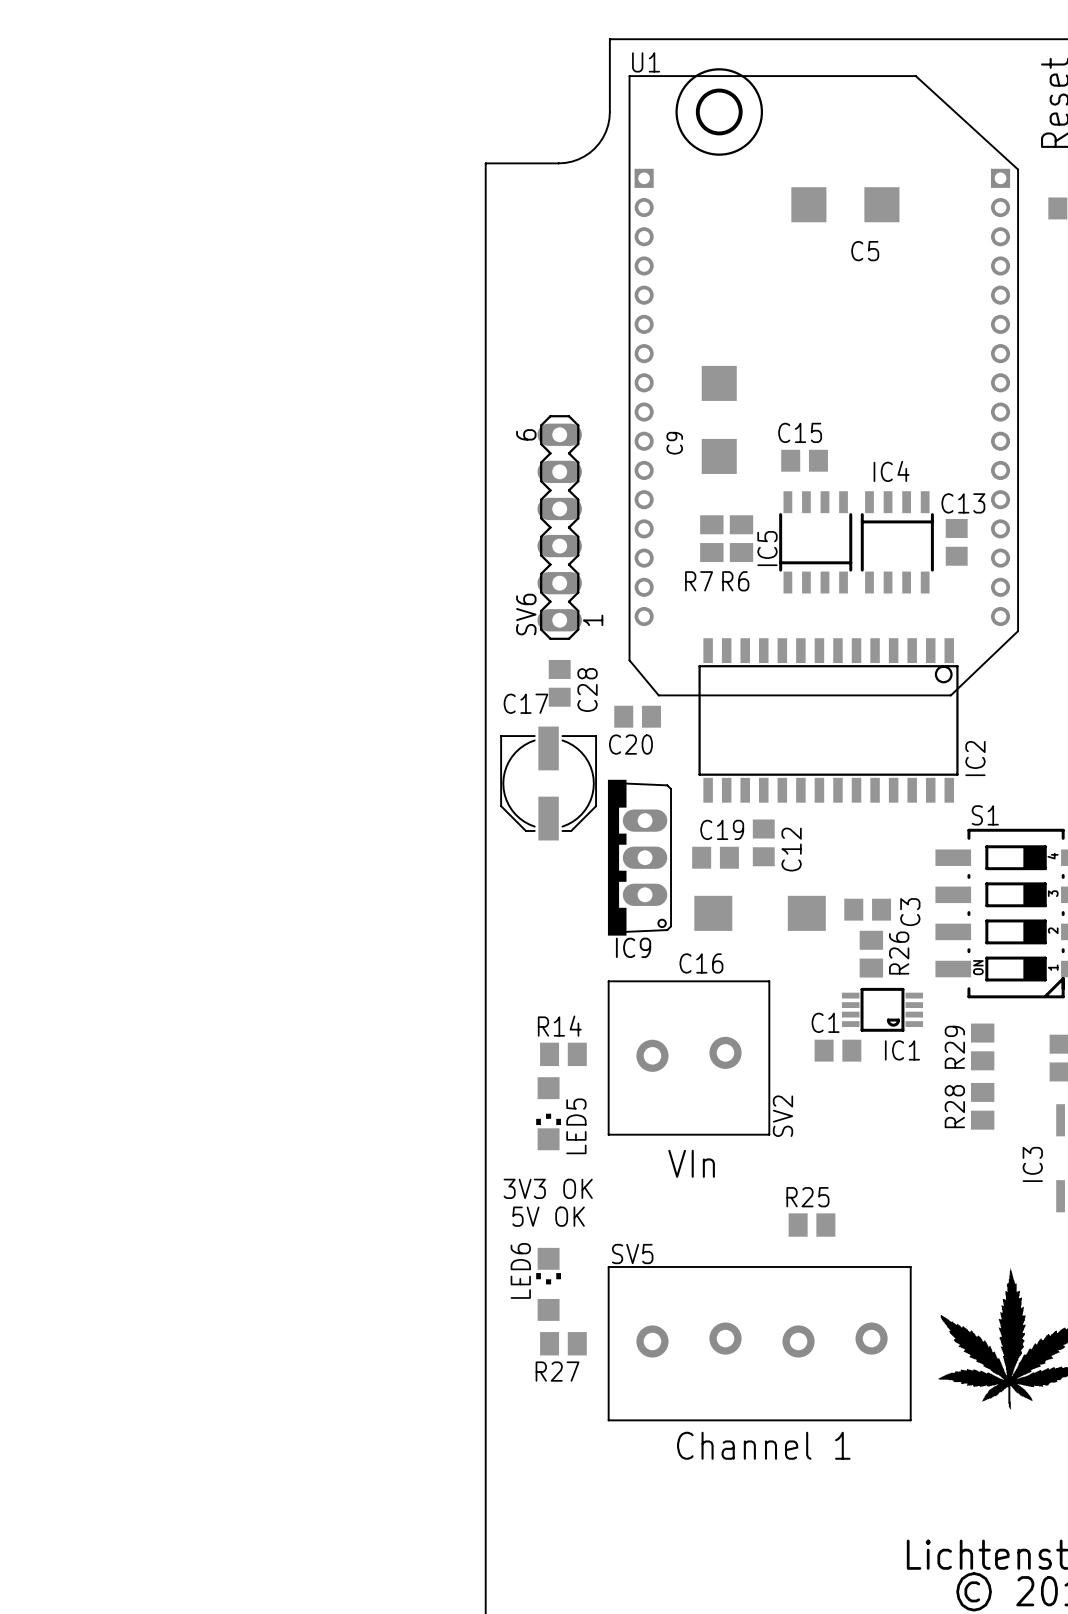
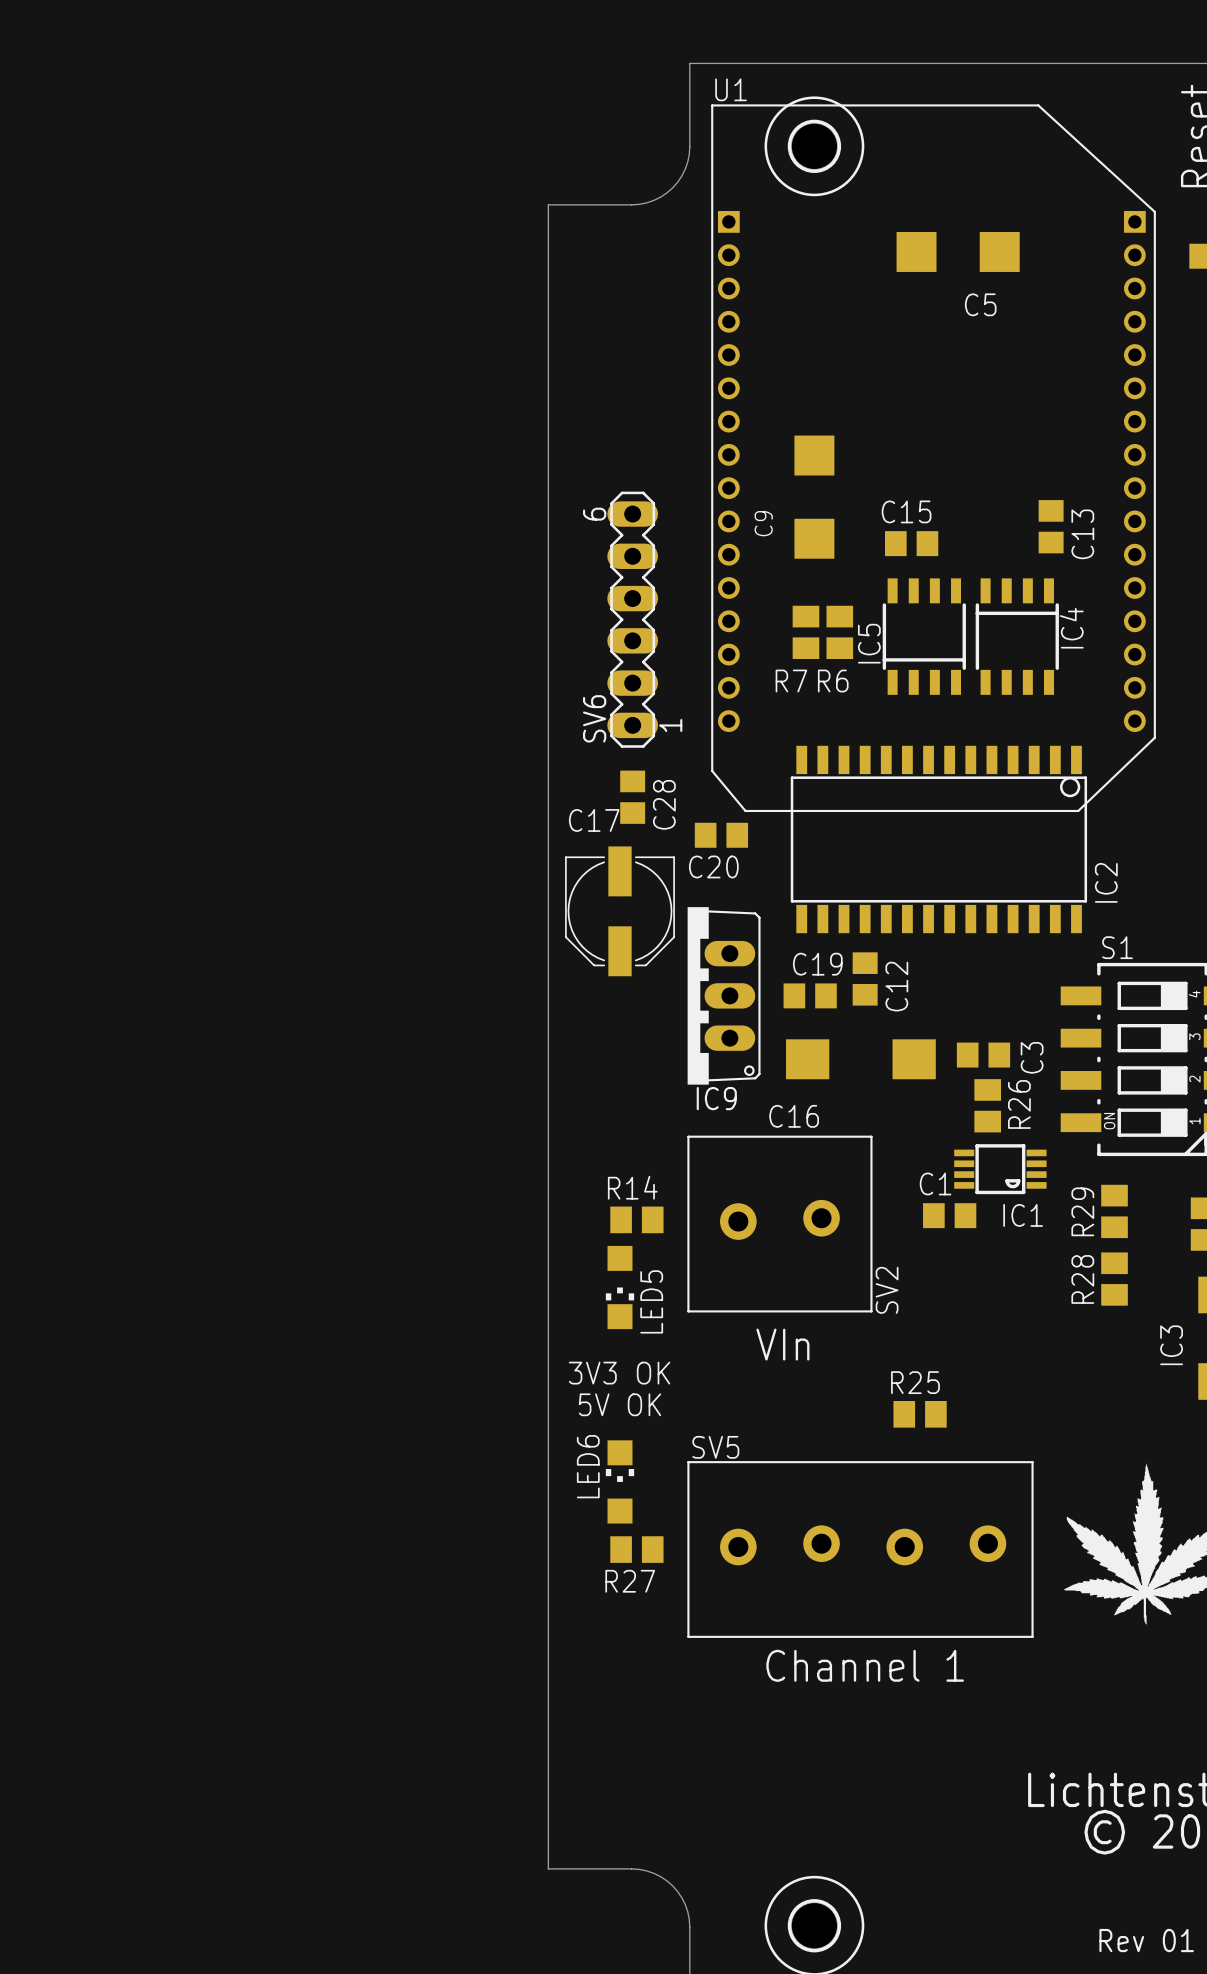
IC4 name rotation: 0° (891, 471) -> 90° counterclockwise (1071, 628)
IC4 name position: IC4 (891, 471) -> IC4 (1071, 628)
C13 name rotation: 0° (963, 503) -> 90° counterclockwise (1082, 534)
C13 position: (956, 542) -> (1051, 526)

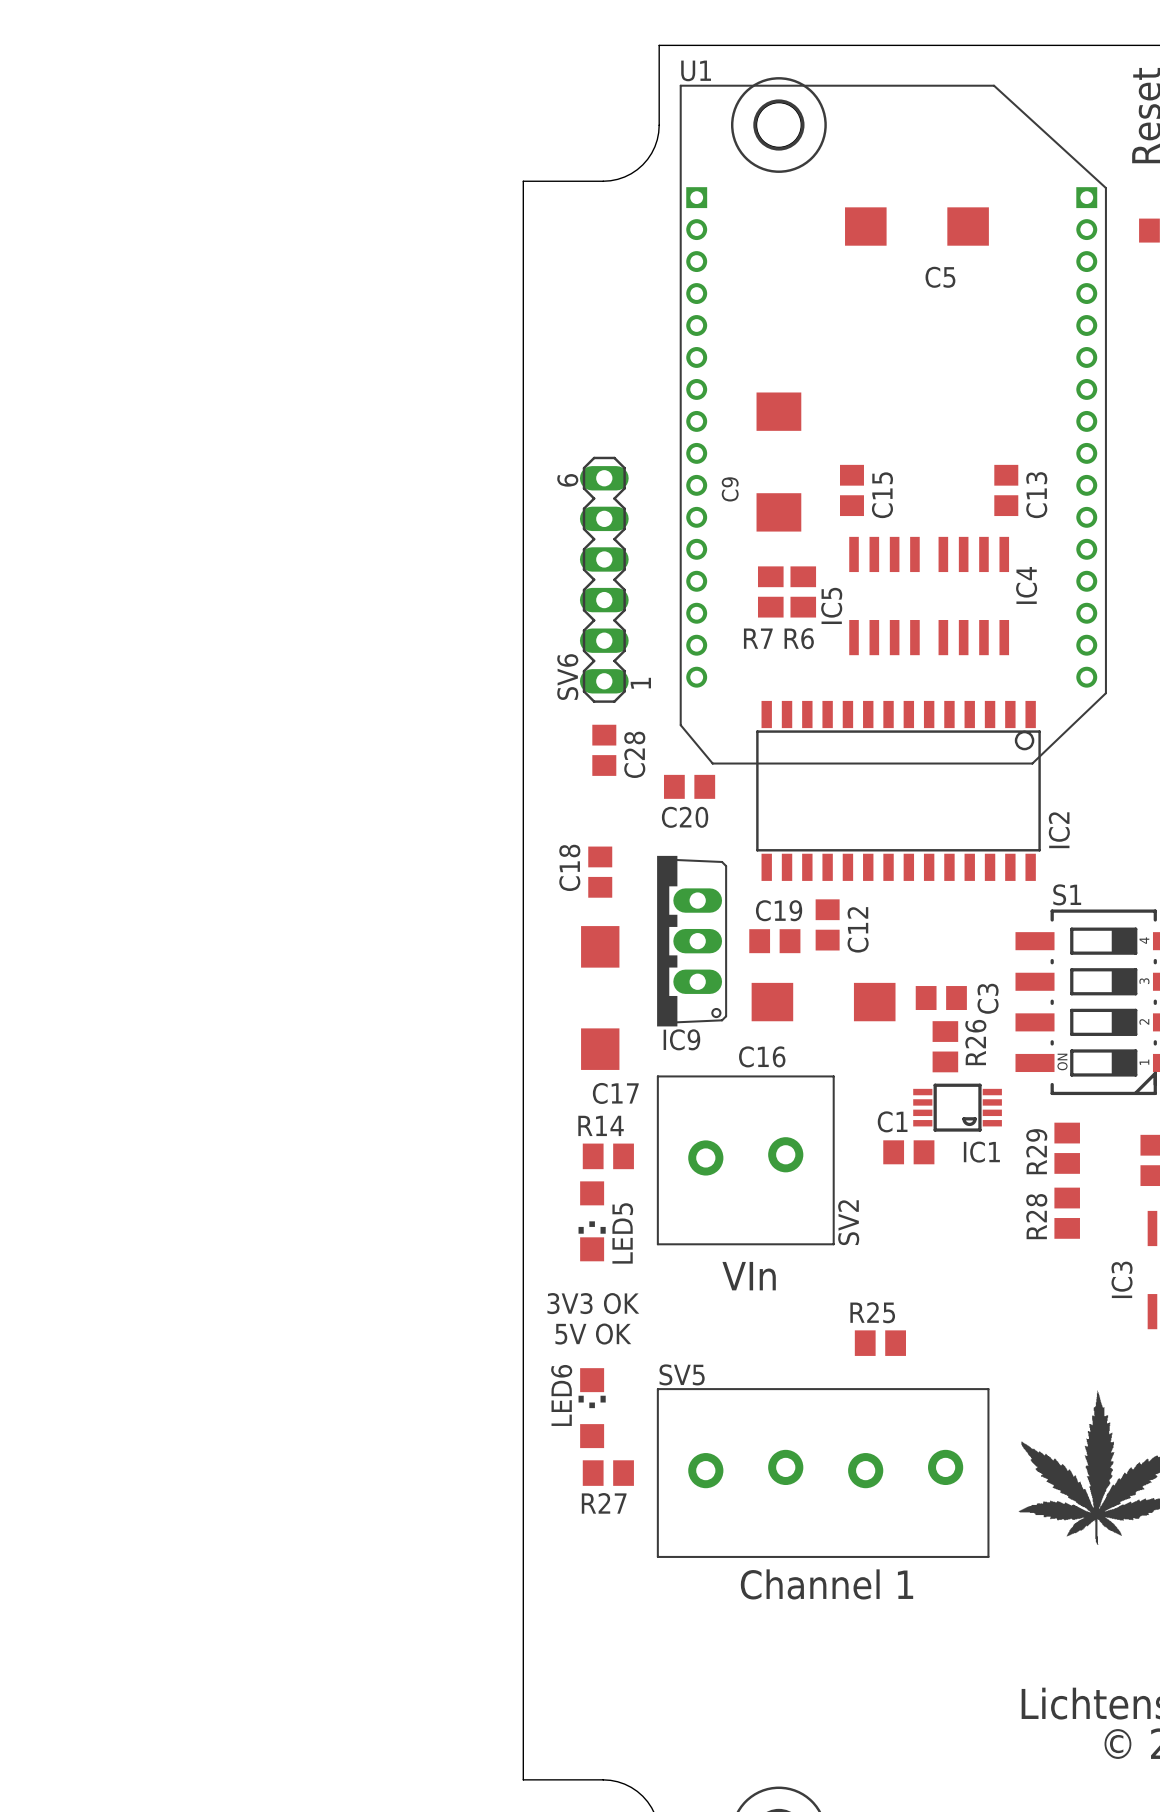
C5 footprint: [896, 232, 1020, 272] -> [845, 207, 989, 246]
C9 footprint: [794, 435, 835, 559] -> [756, 392, 802, 532]
C15 rotation: 0° (911, 543) -> 90° clockwise (851, 490)
IC5 footprint: [882, 578, 966, 695] -> [849, 536, 920, 656]
IC4 footprint: [975, 578, 1059, 695] -> [938, 536, 1010, 656]
C17 name position: C17 (594, 820) -> C17 (615, 1093)
C17 footprint: [565, 846, 675, 977] -> [581, 926, 620, 1070]
C18: none -> (600, 872)

